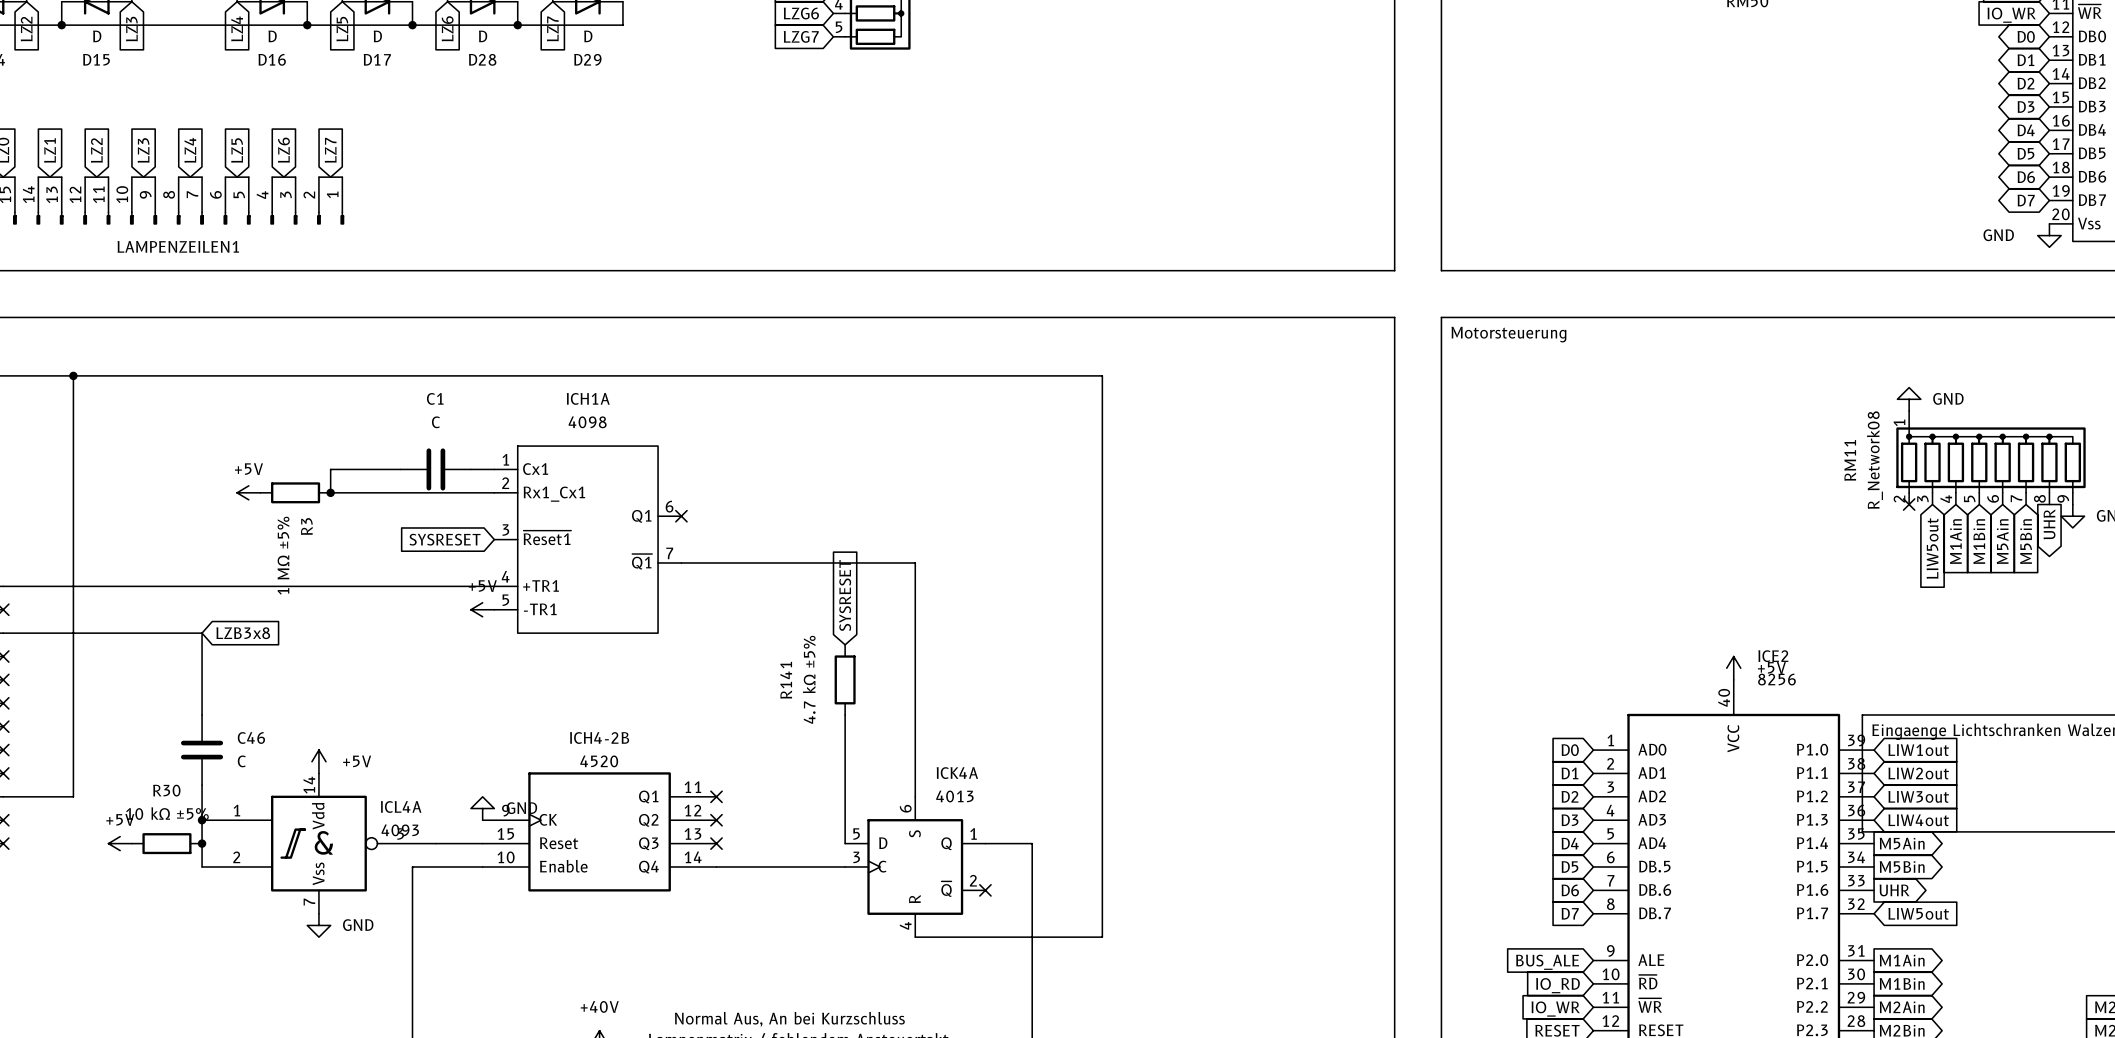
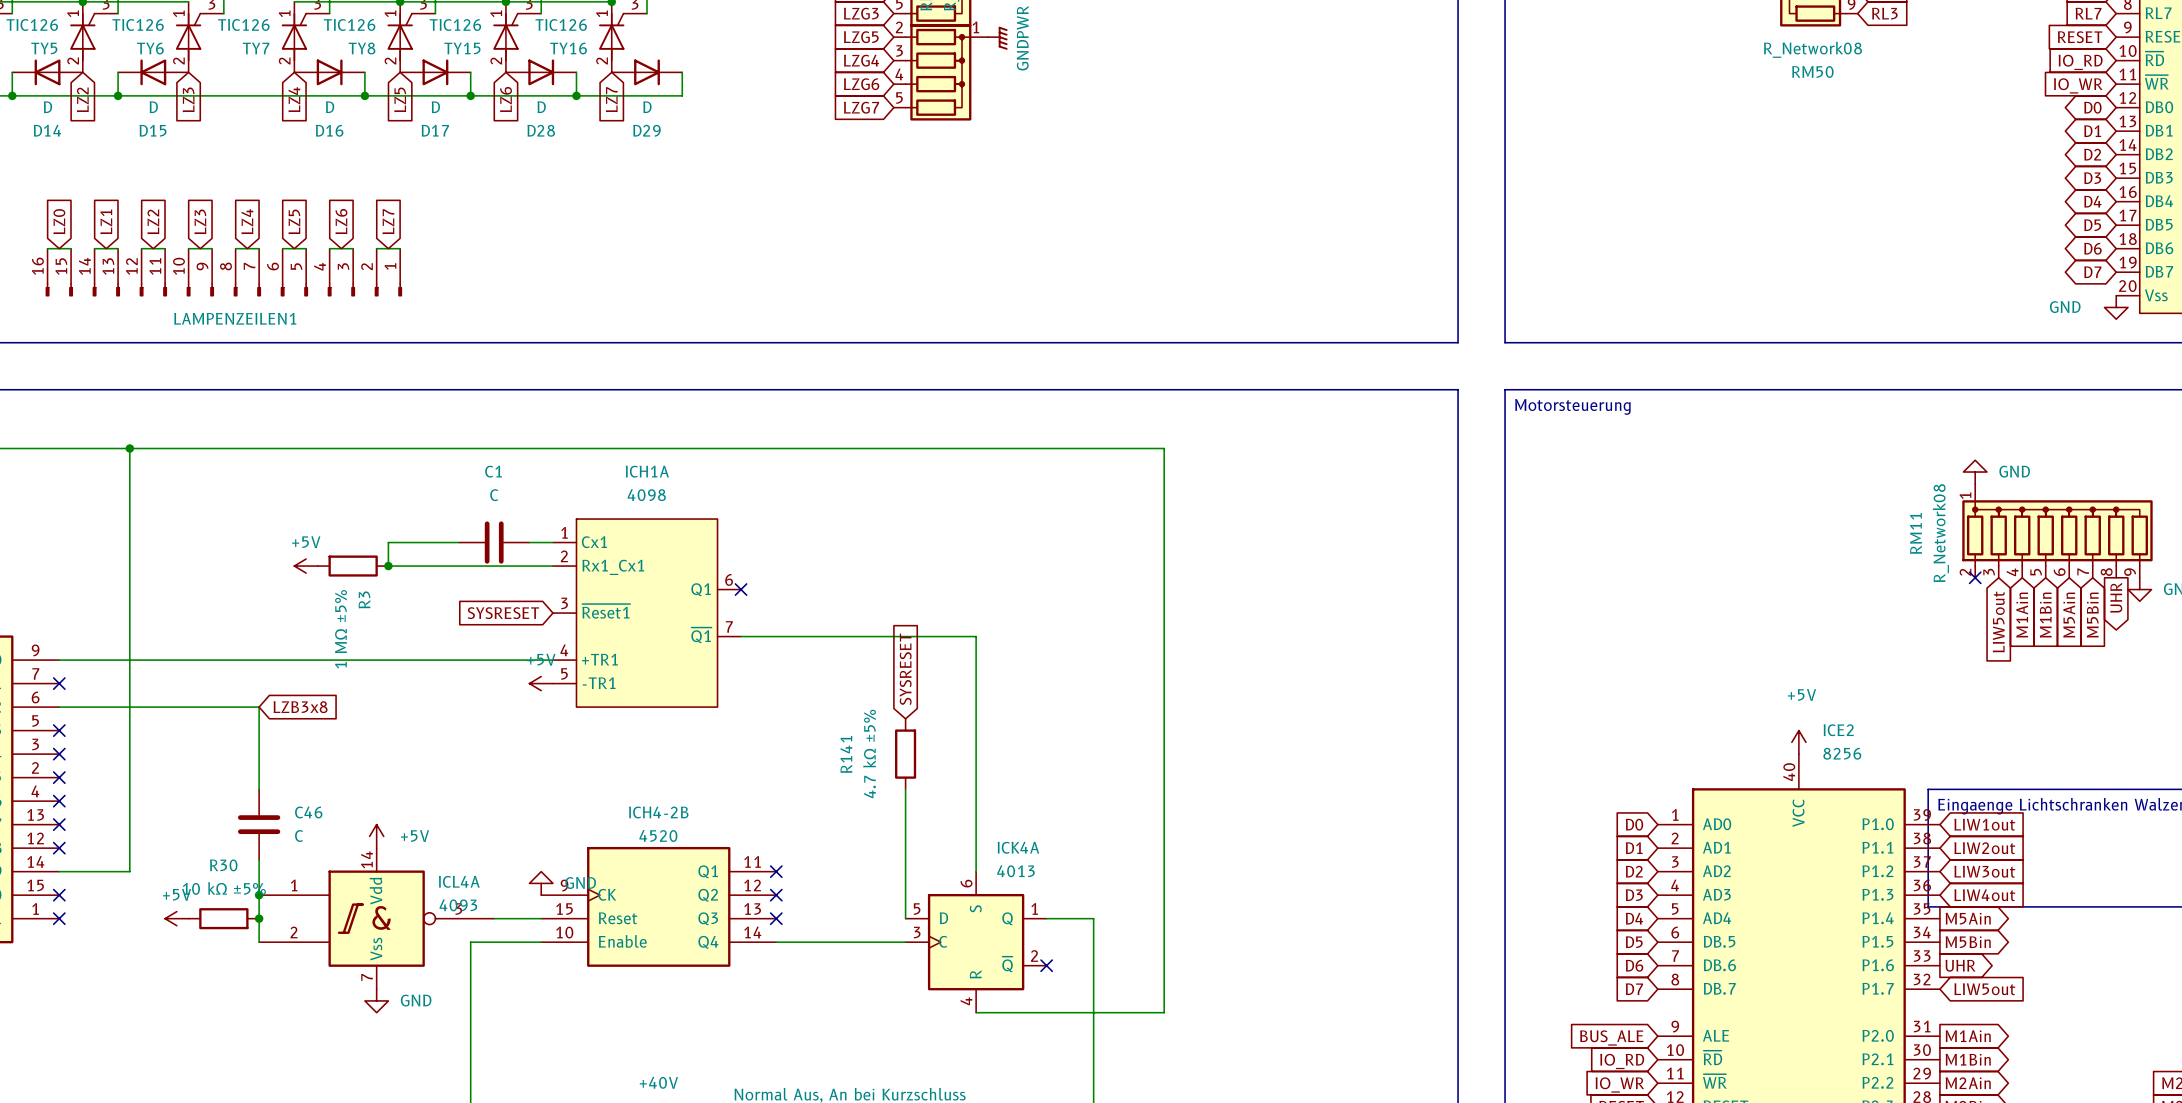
power symbol text position: +5V (1771, 667) -> +5V (1801, 694)

